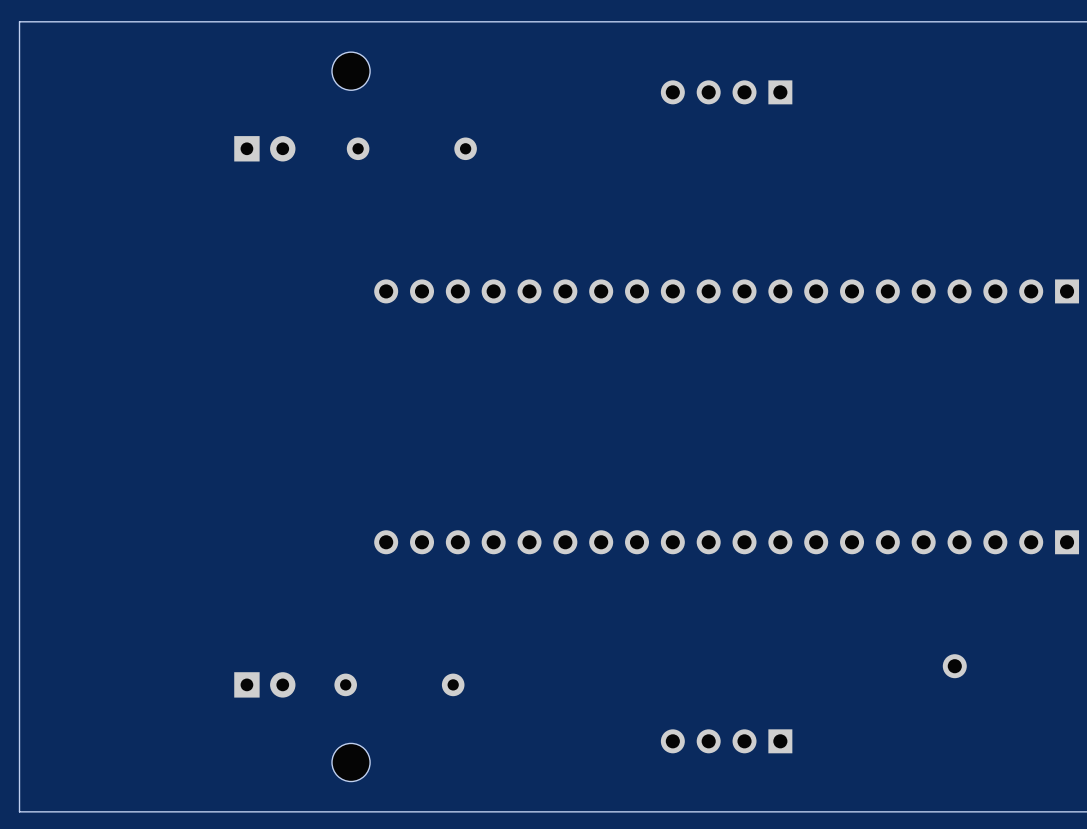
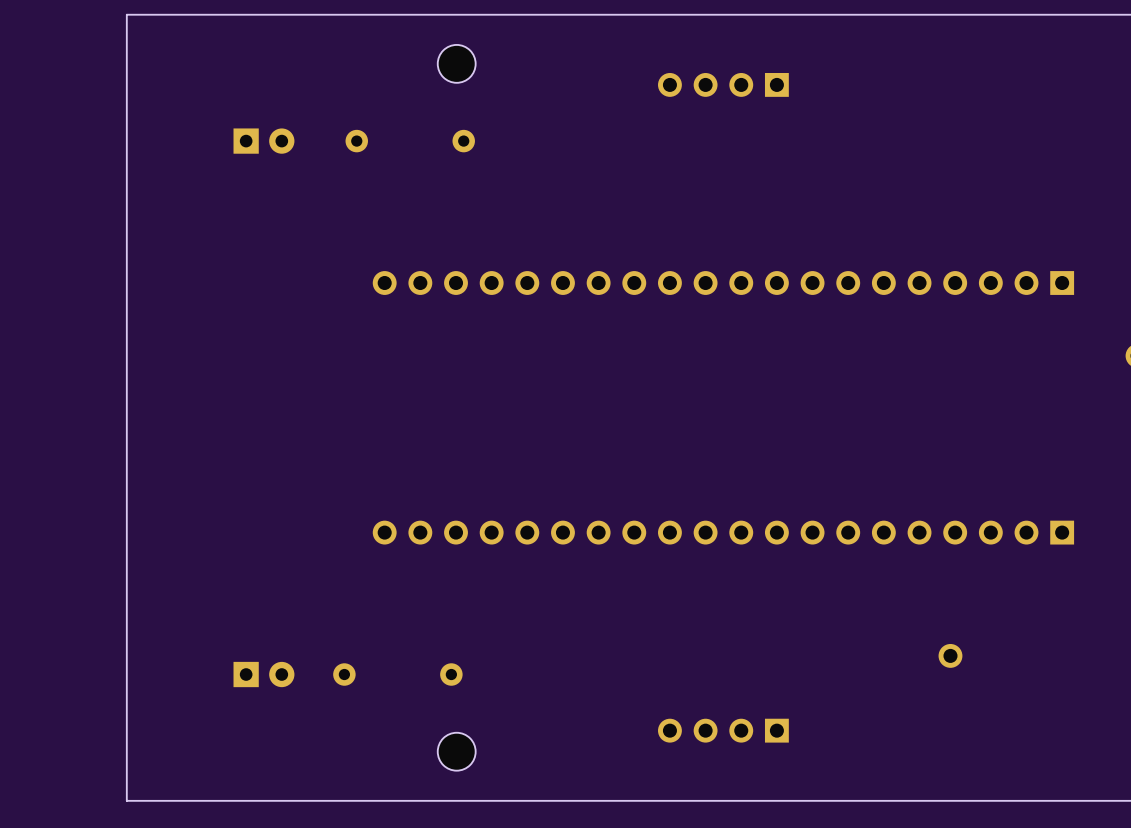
board edge: (127, 21) (19, 21) (19, 811) (127, 811) -> (126, 14) (126, 800)
part position: (351, 71) -> (456, 63)
part position: (351, 762) -> (456, 751)

